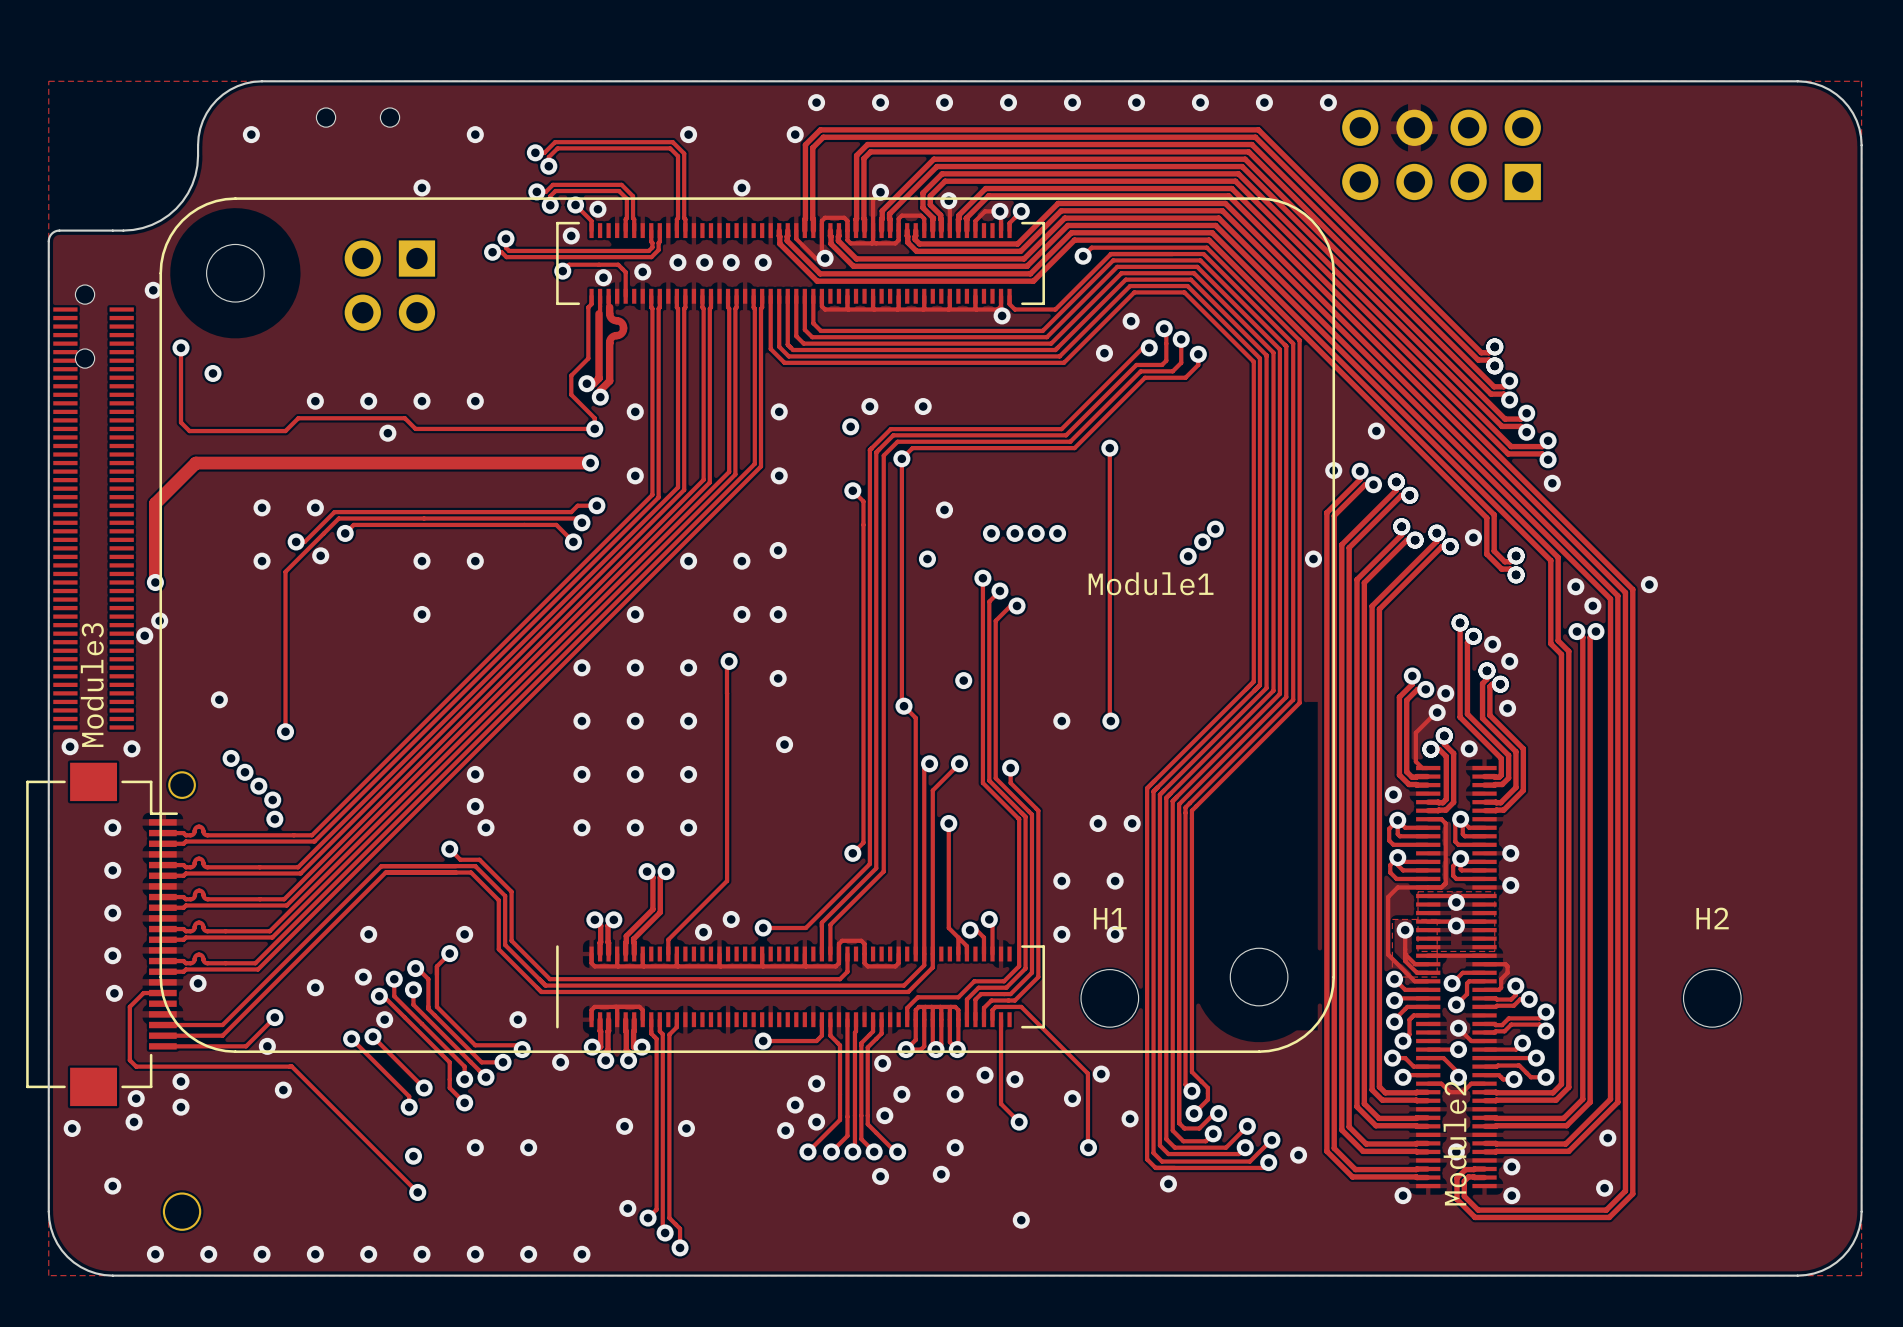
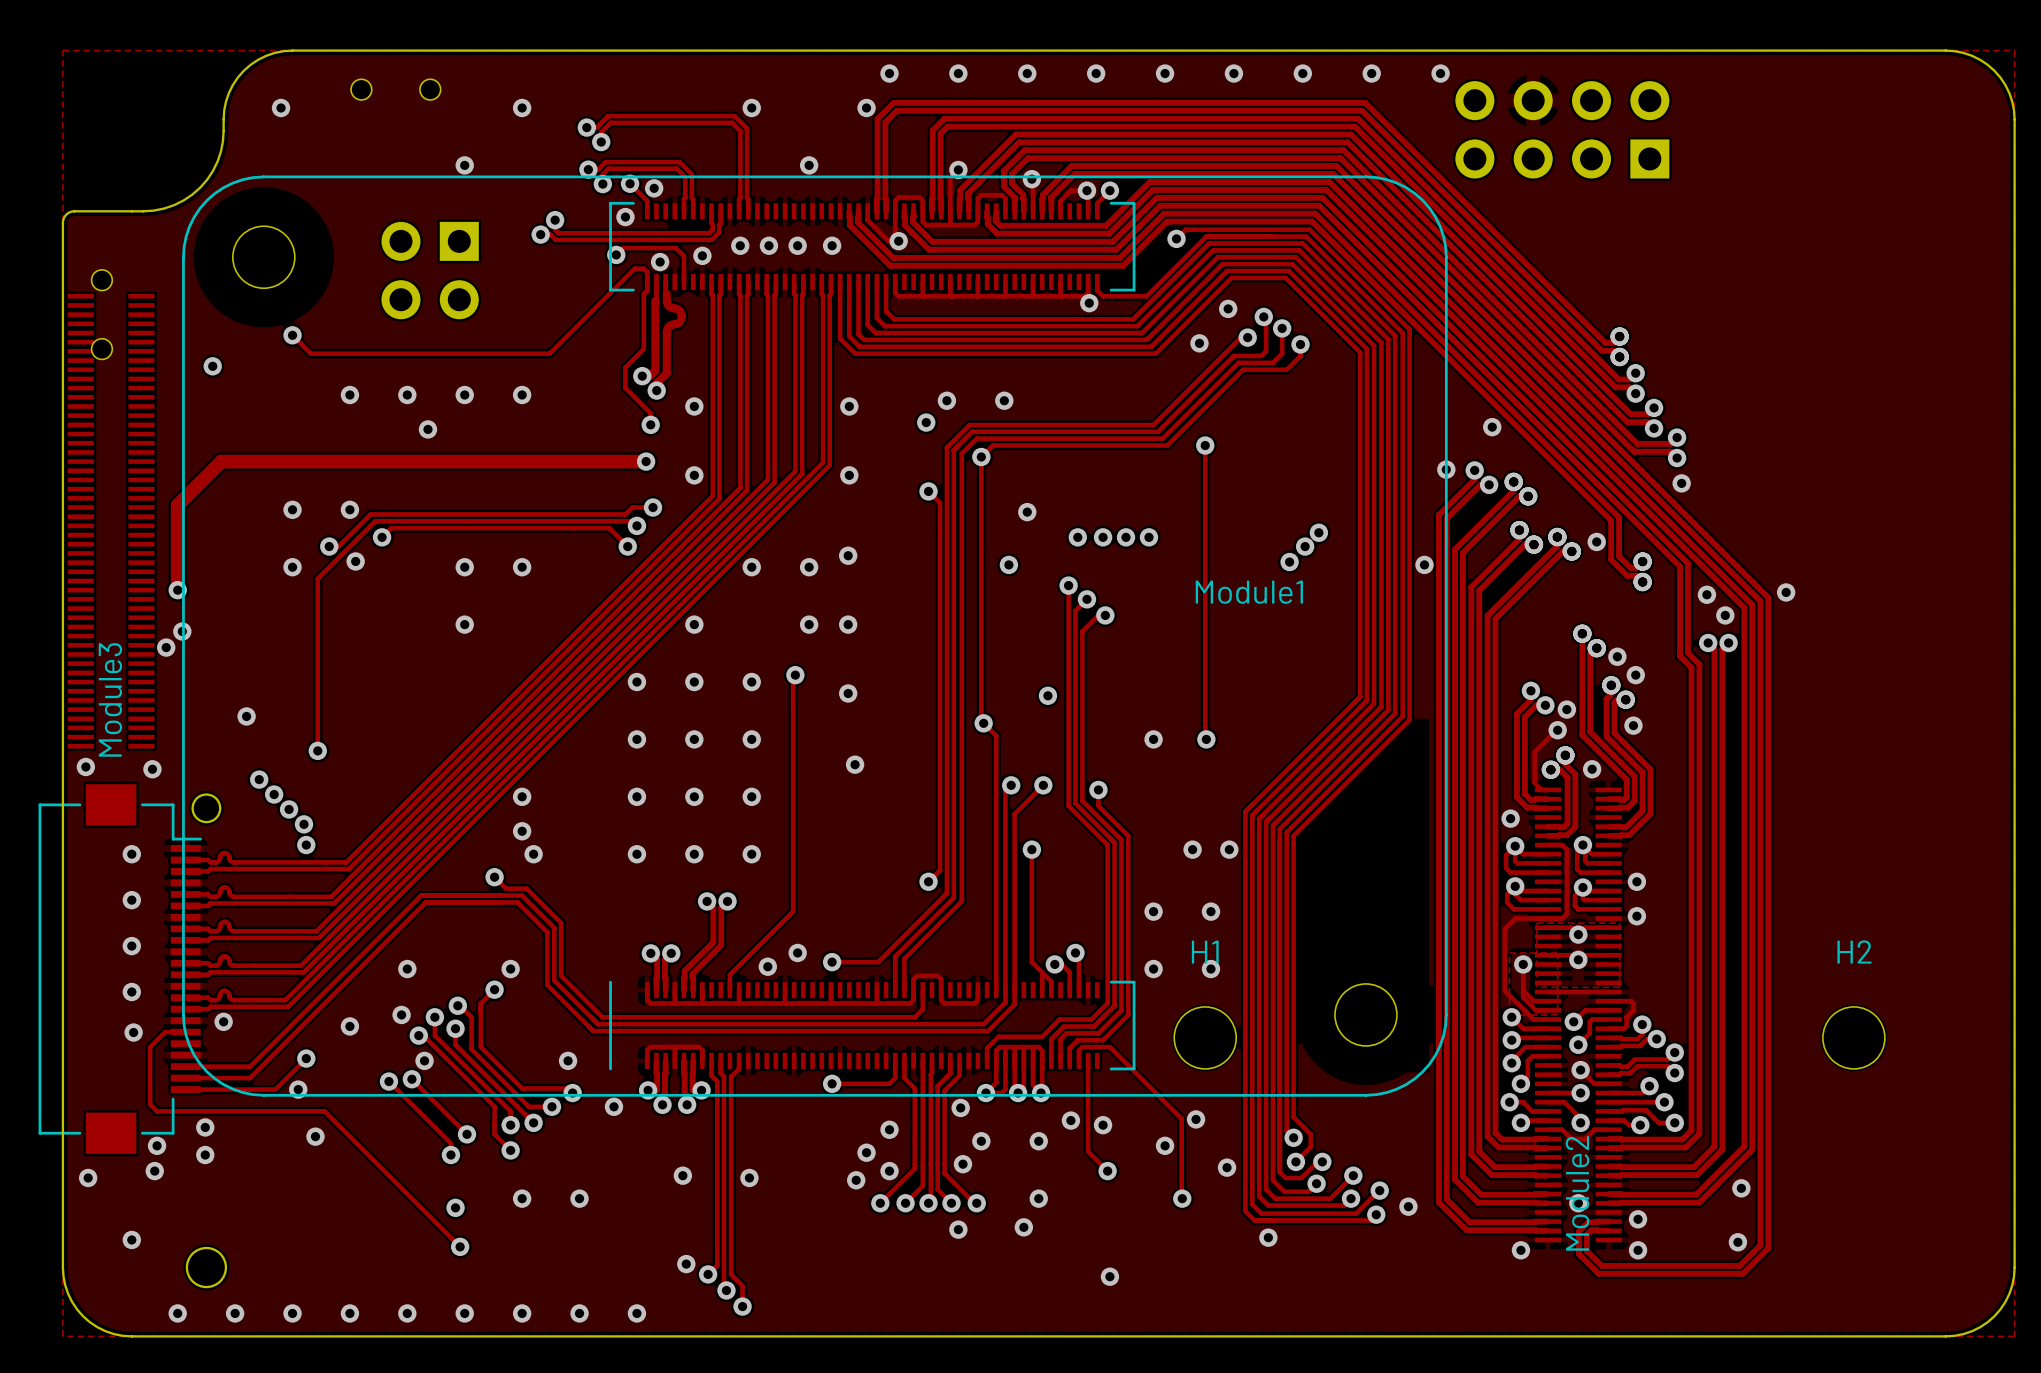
via: (153, 290) -> none
track: none -> (647, 282) (647, 272) (643, 268) (634, 268) (549, 353) (310, 353) (292, 335)
via: none -> (292, 335)
track: (181, 347) (181, 422) (189, 431) (285, 431) (298, 418) (404, 418) (415, 428) (594, 428) -> none
via: (181, 347) -> none
via: (212, 373) -> none
via: none -> (212, 366)

